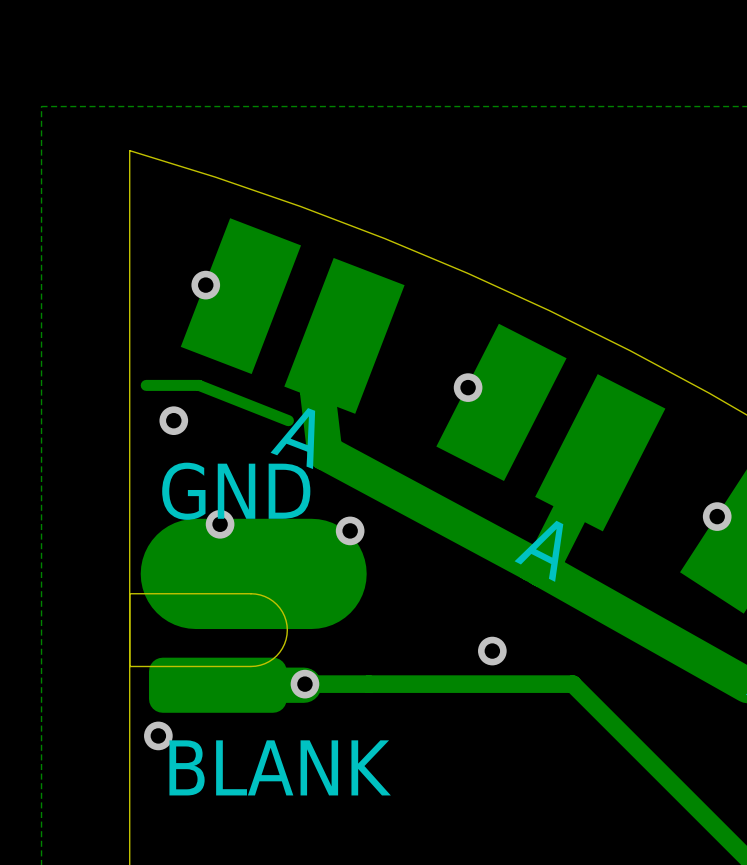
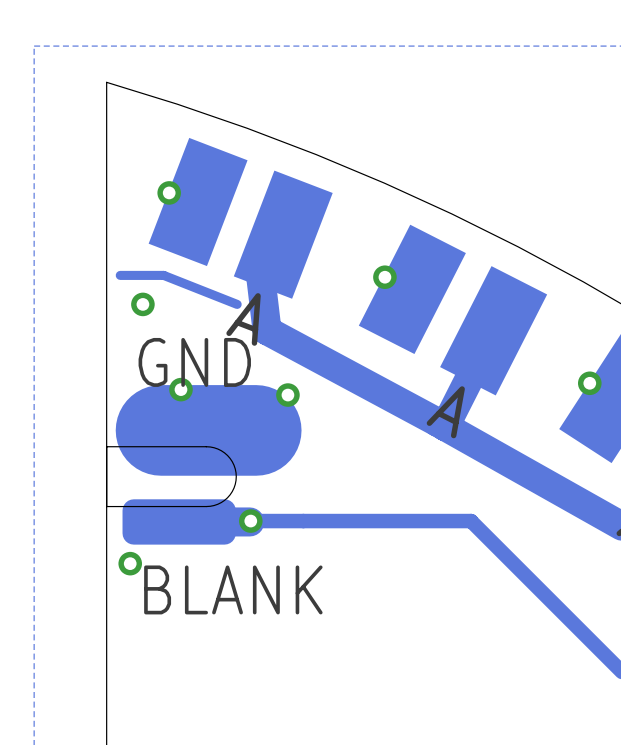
via: (492, 651) -> none

